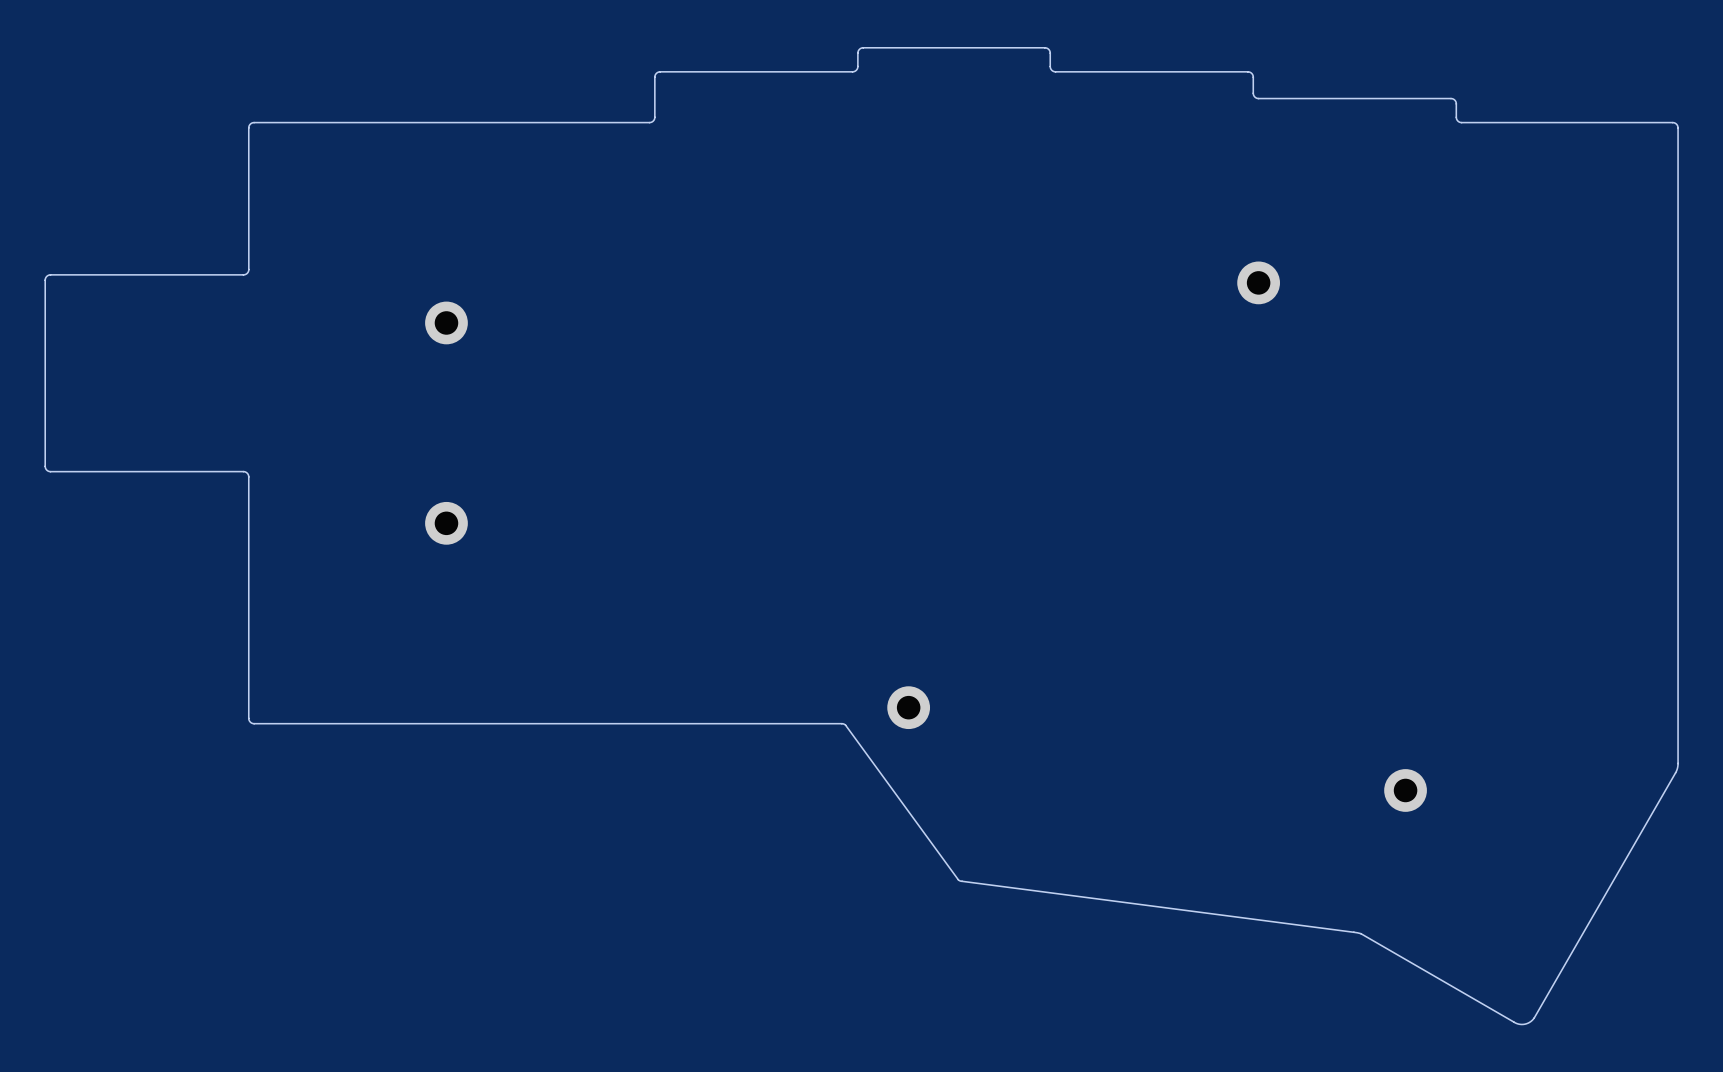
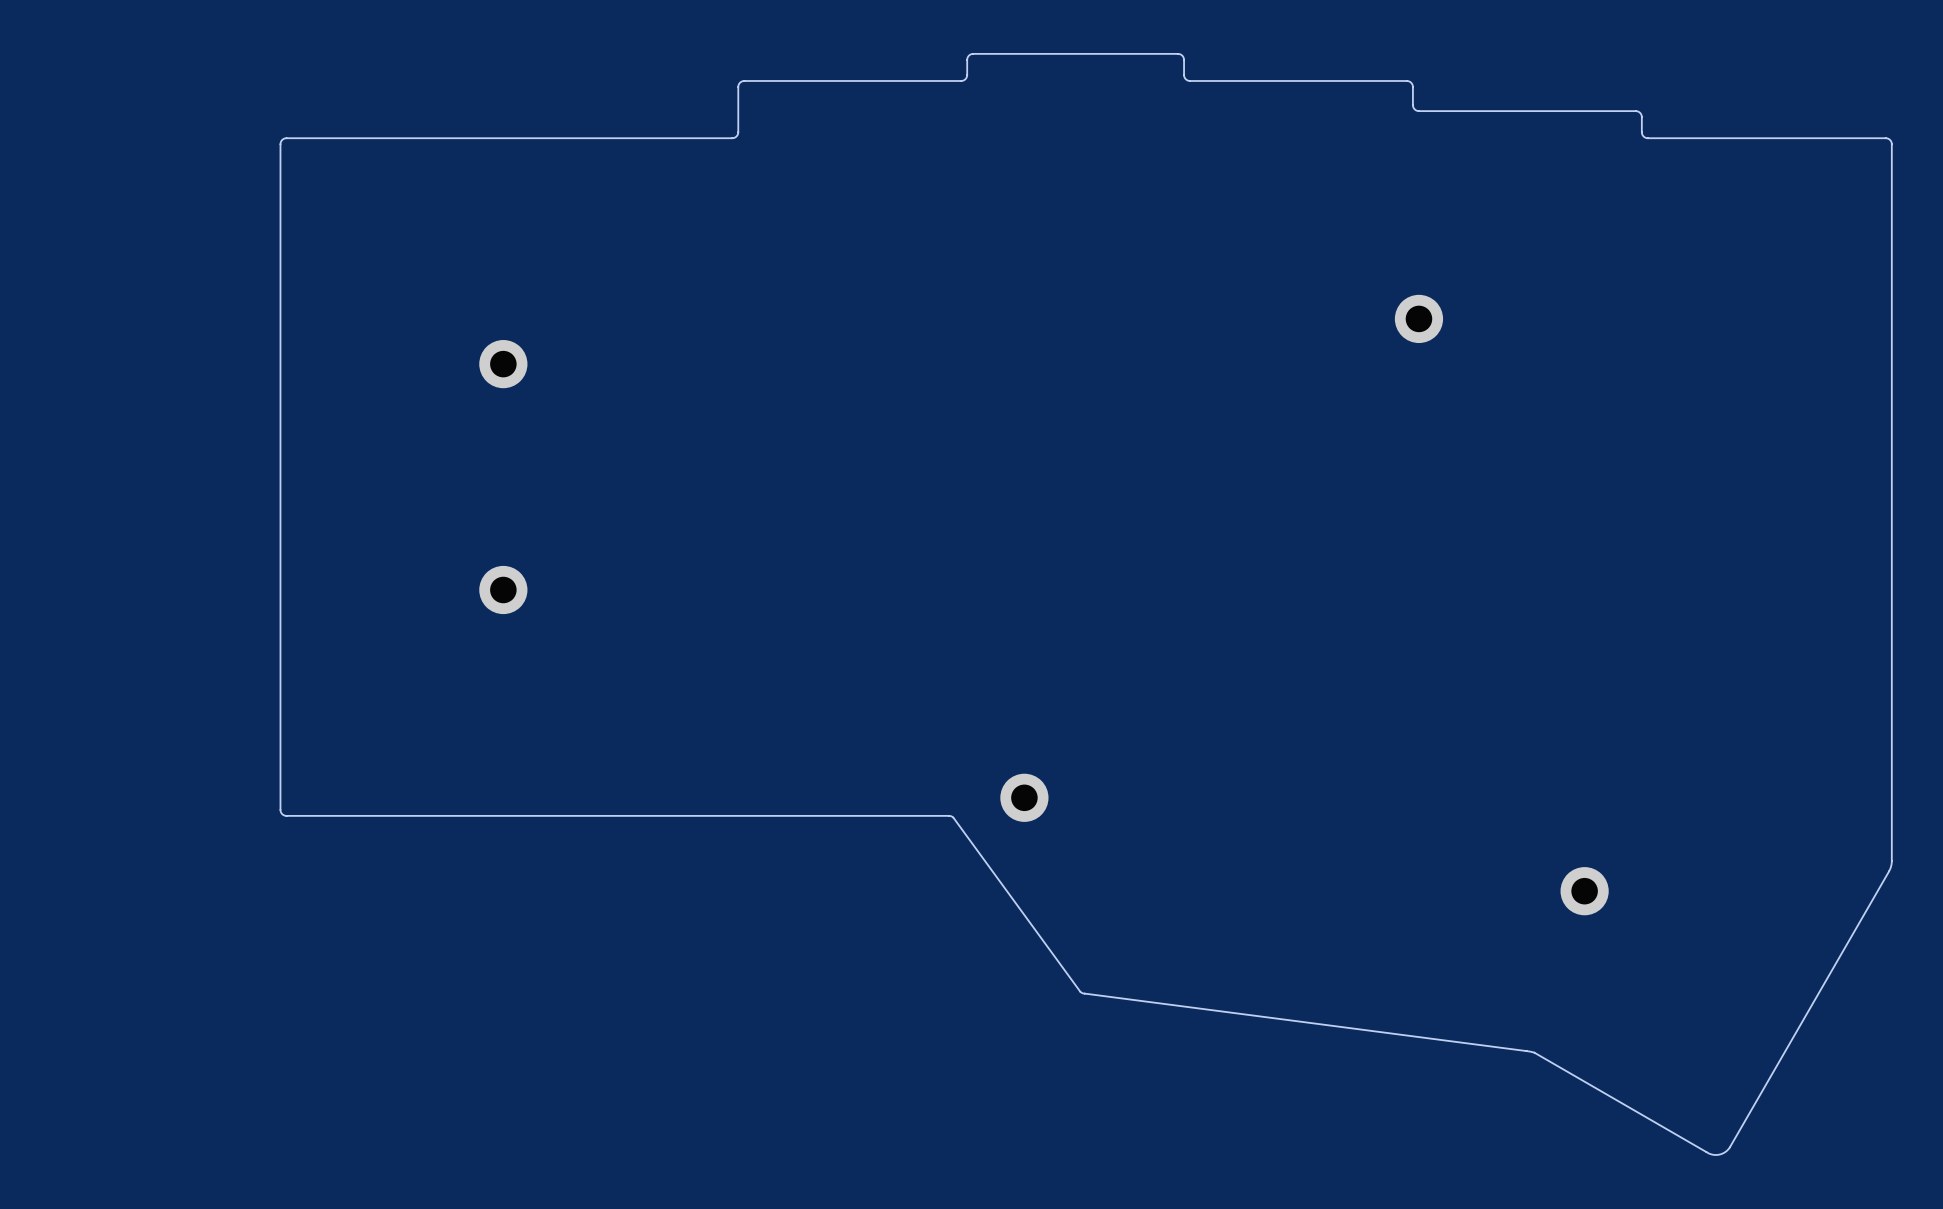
board edge: (248, 127) (248, 269) (246, 273) (50, 274) (46, 276) (45, 280) (45, 466) (46, 470) (50, 471) (243, 471) (247, 473) (248, 476) -> (280, 144) (280, 537)

